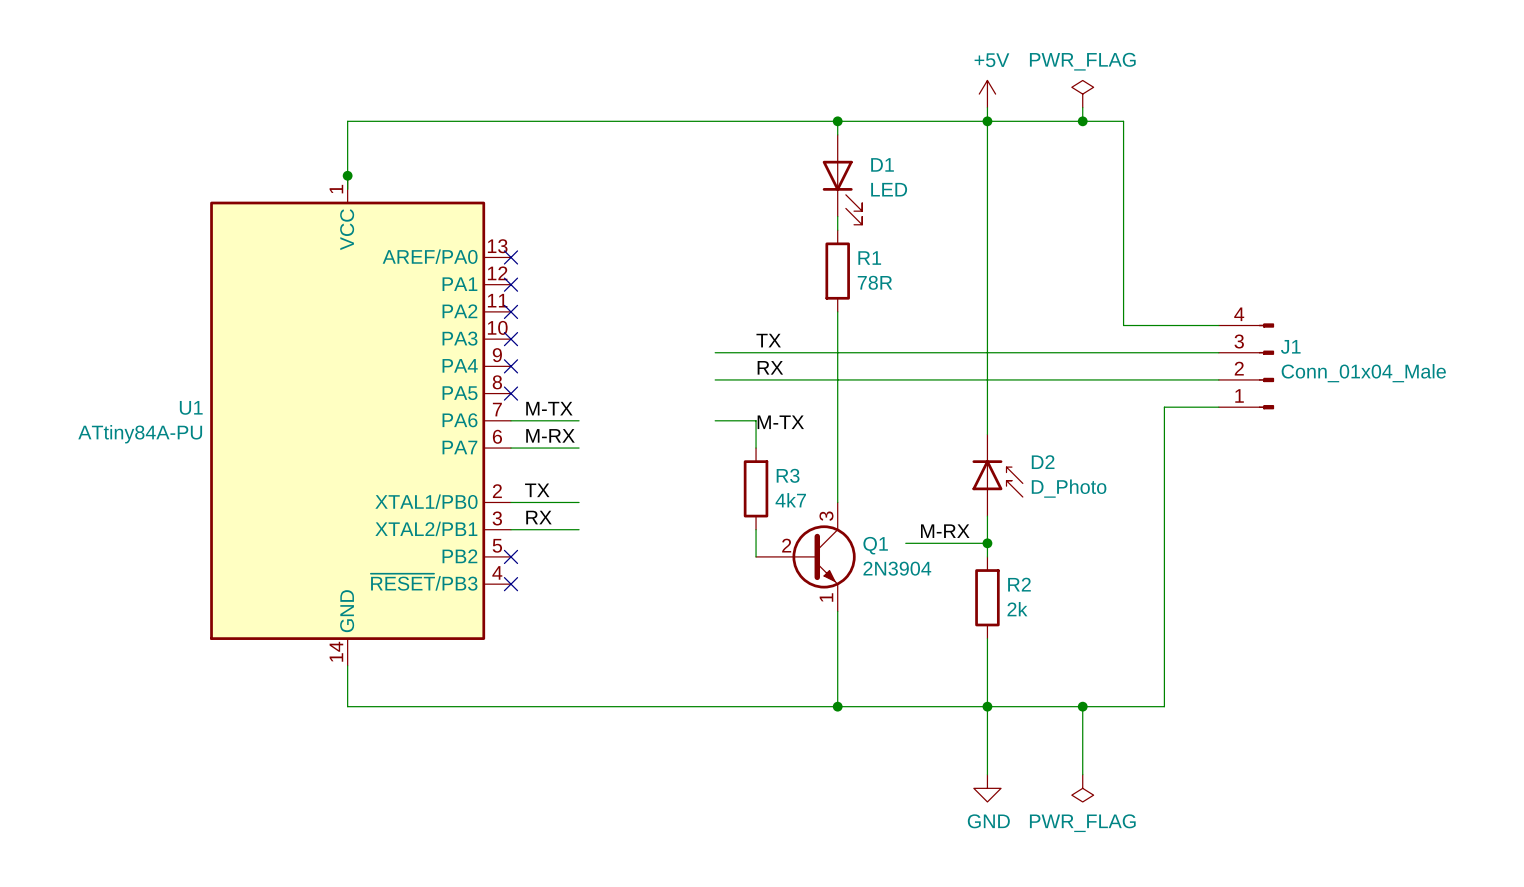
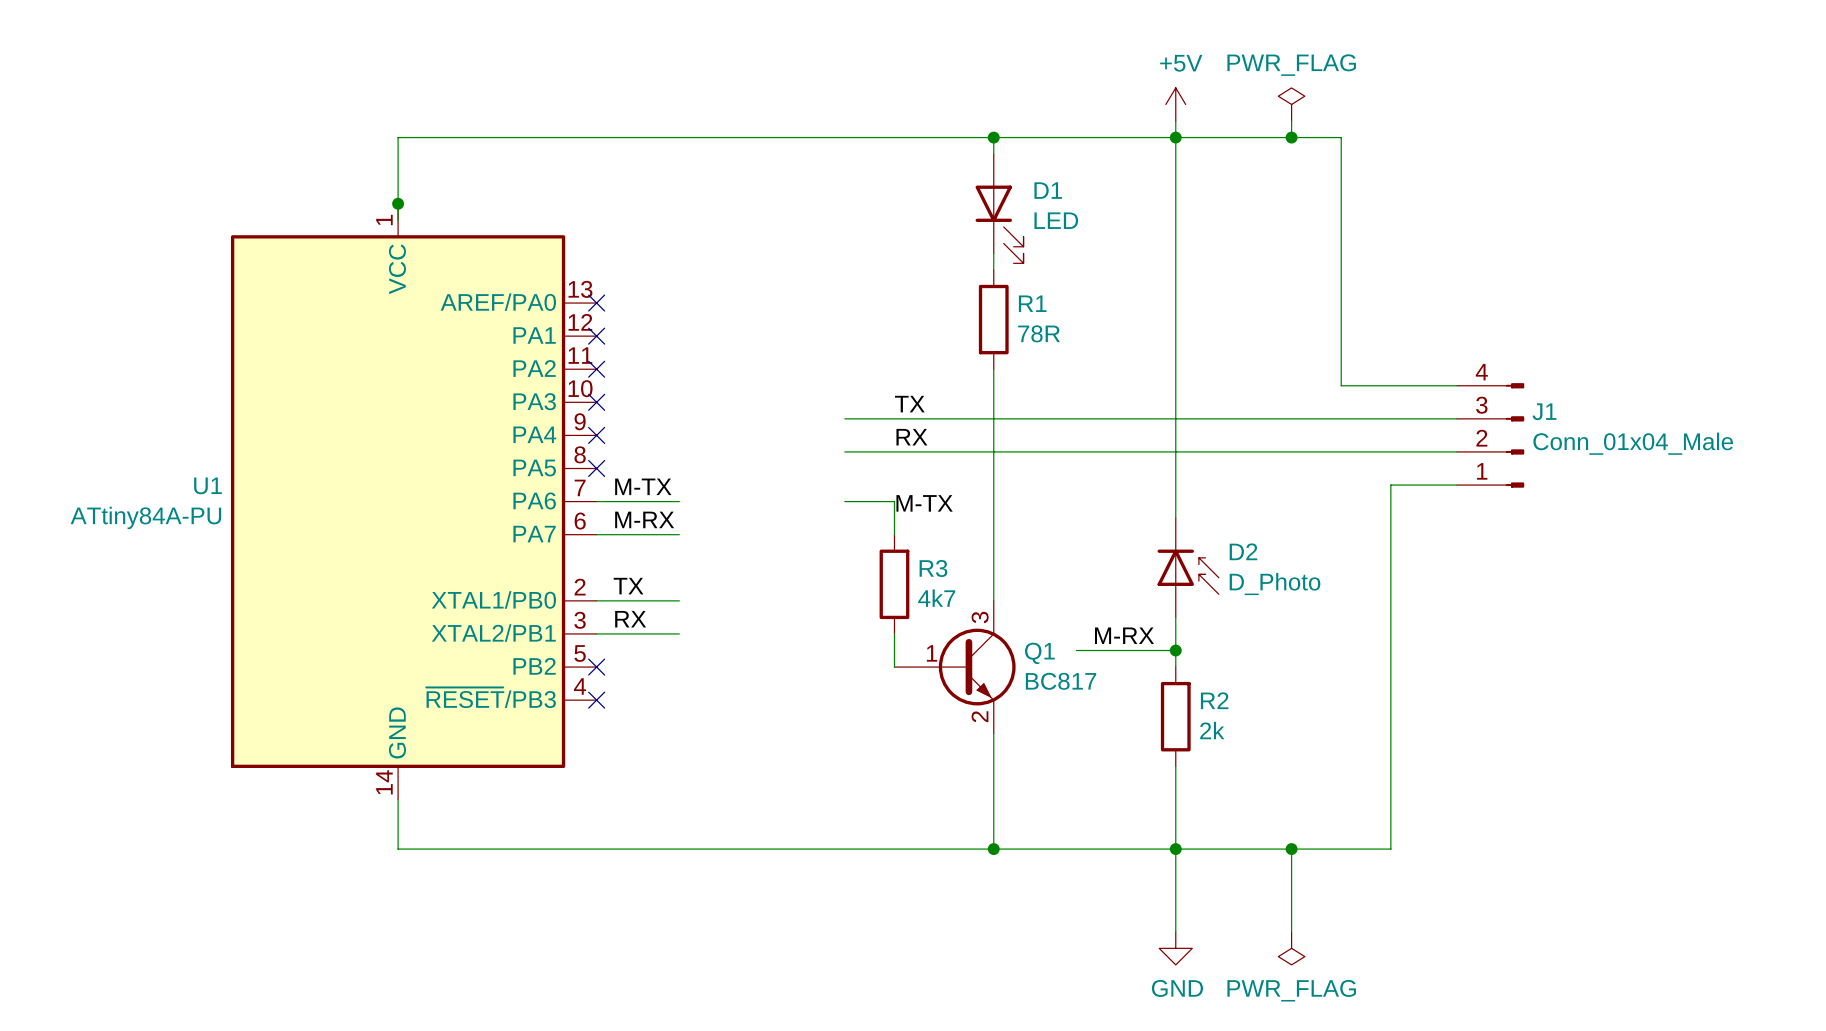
Q1 pin number: 2 (786, 545) -> 1 (932, 653)
Q1 value: 2N3904 (897, 568) -> BC817 (1061, 681)
Q1 pin number: 1 (826, 597) -> 2 (979, 716)

